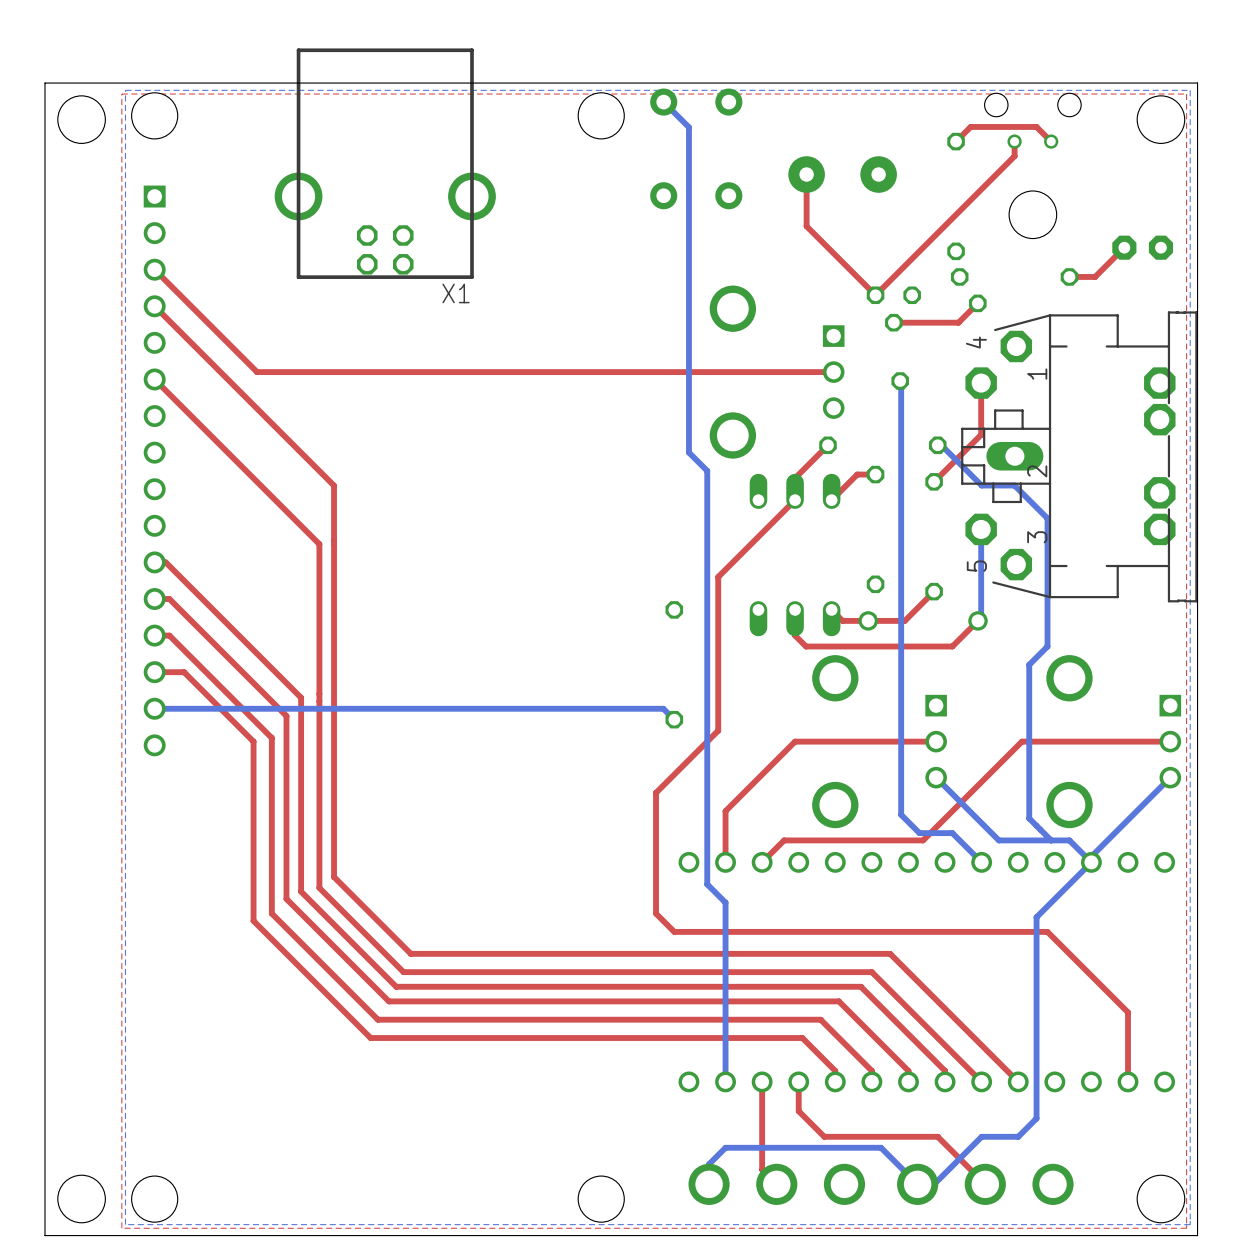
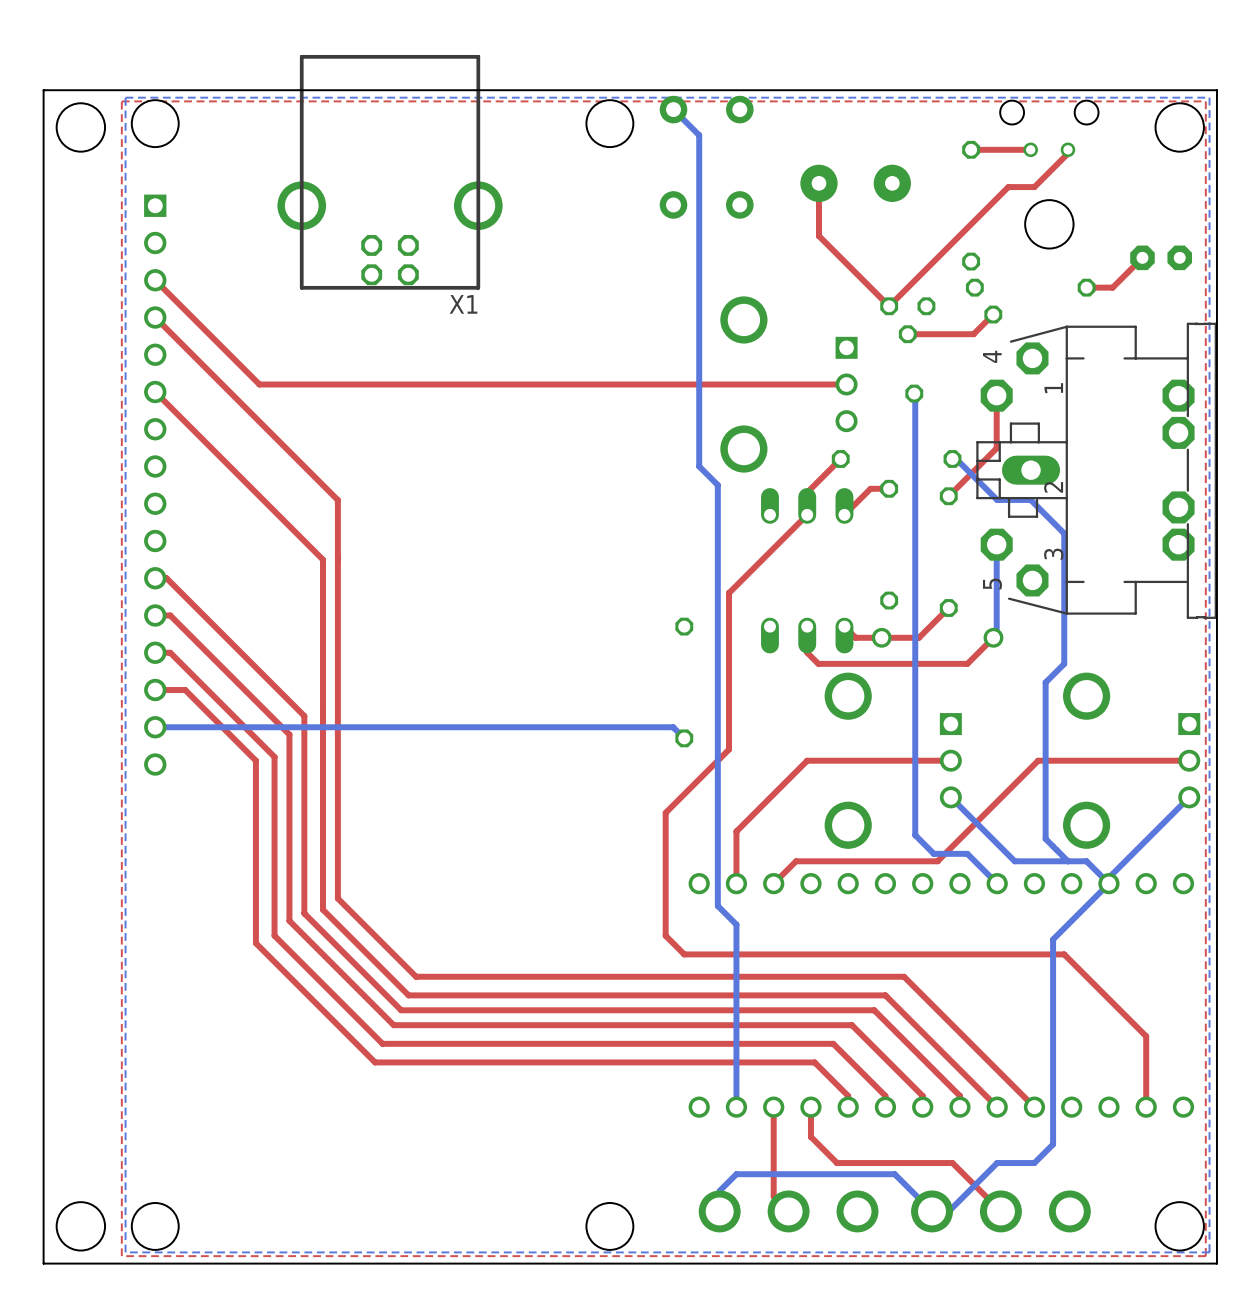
top track: (1014, 141) (1014, 156) (992, 178) -> (1067, 149) (1067, 153) (1034, 187) (1008, 187)
top track: (1051, 141) (1036, 126) (970, 126) (956, 141) -> (1030, 149) (971, 149)

